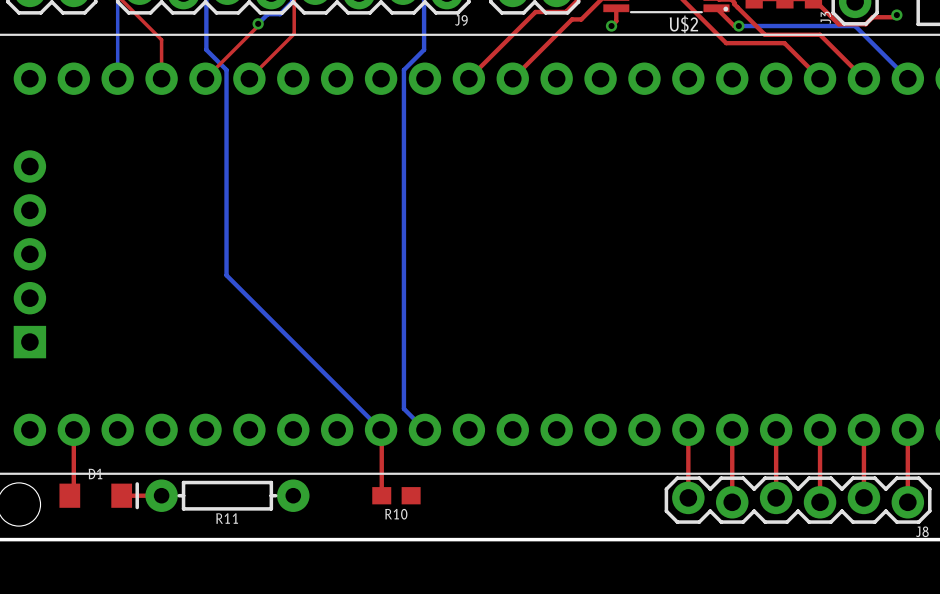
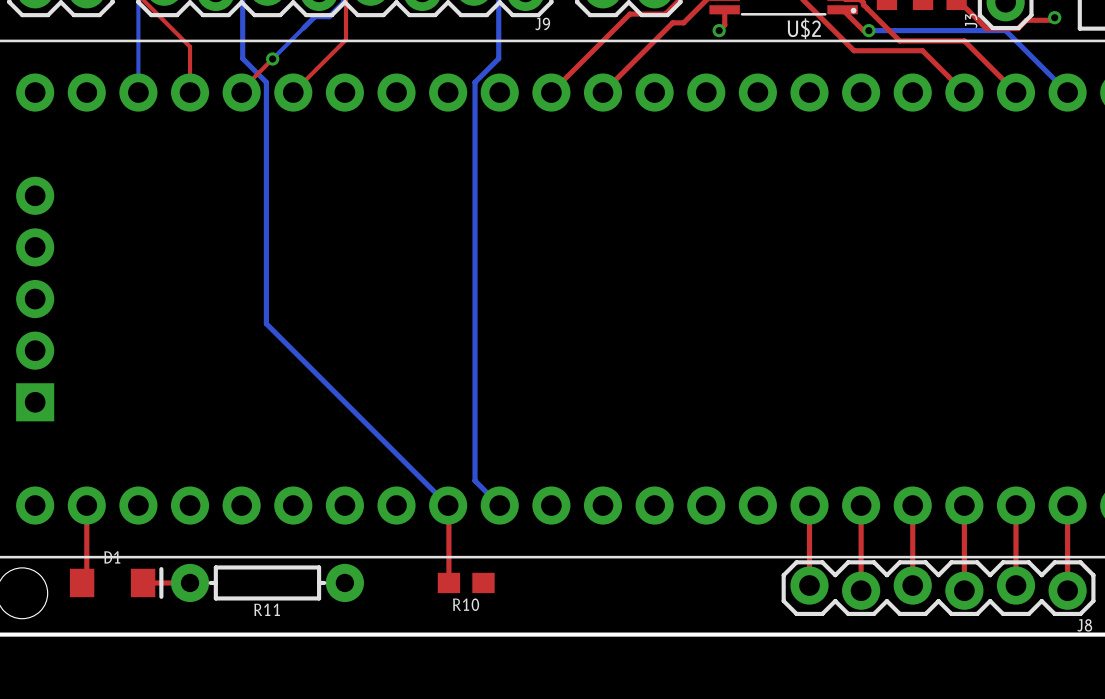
top track: (258, 23) (258, 26) (205, 78) -> (272, 59) (241, 89) (241, 92)
bottom track: none -> (303, 28) (272, 59)
via position: (258, 23) -> (272, 59)

